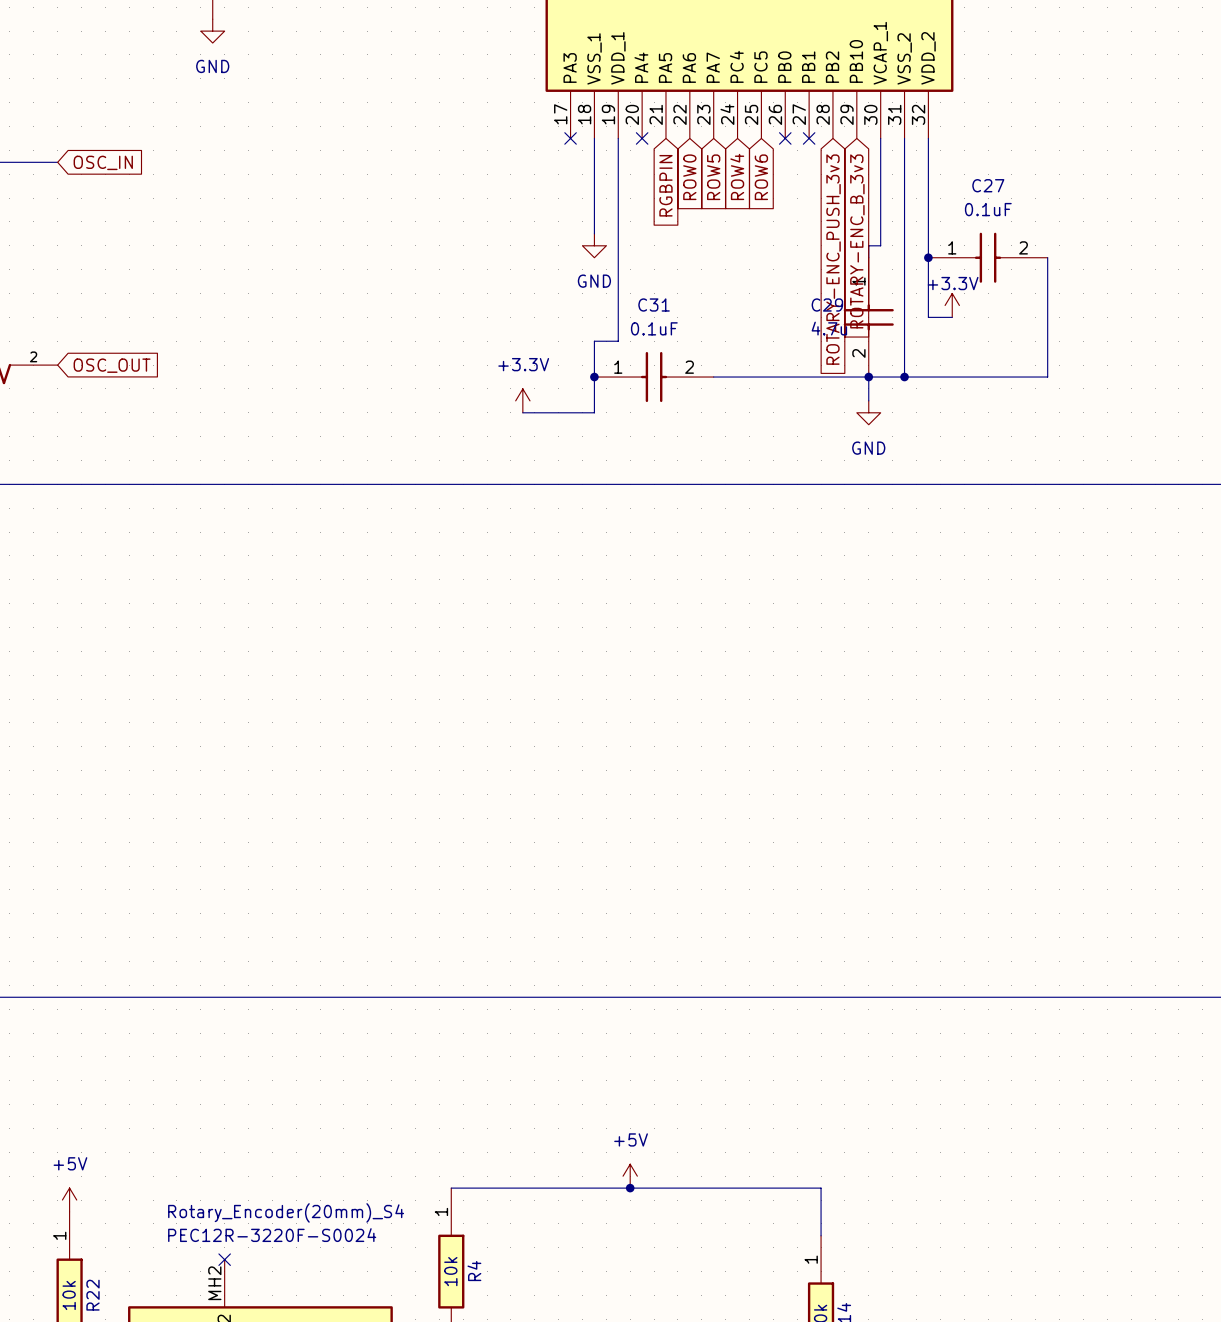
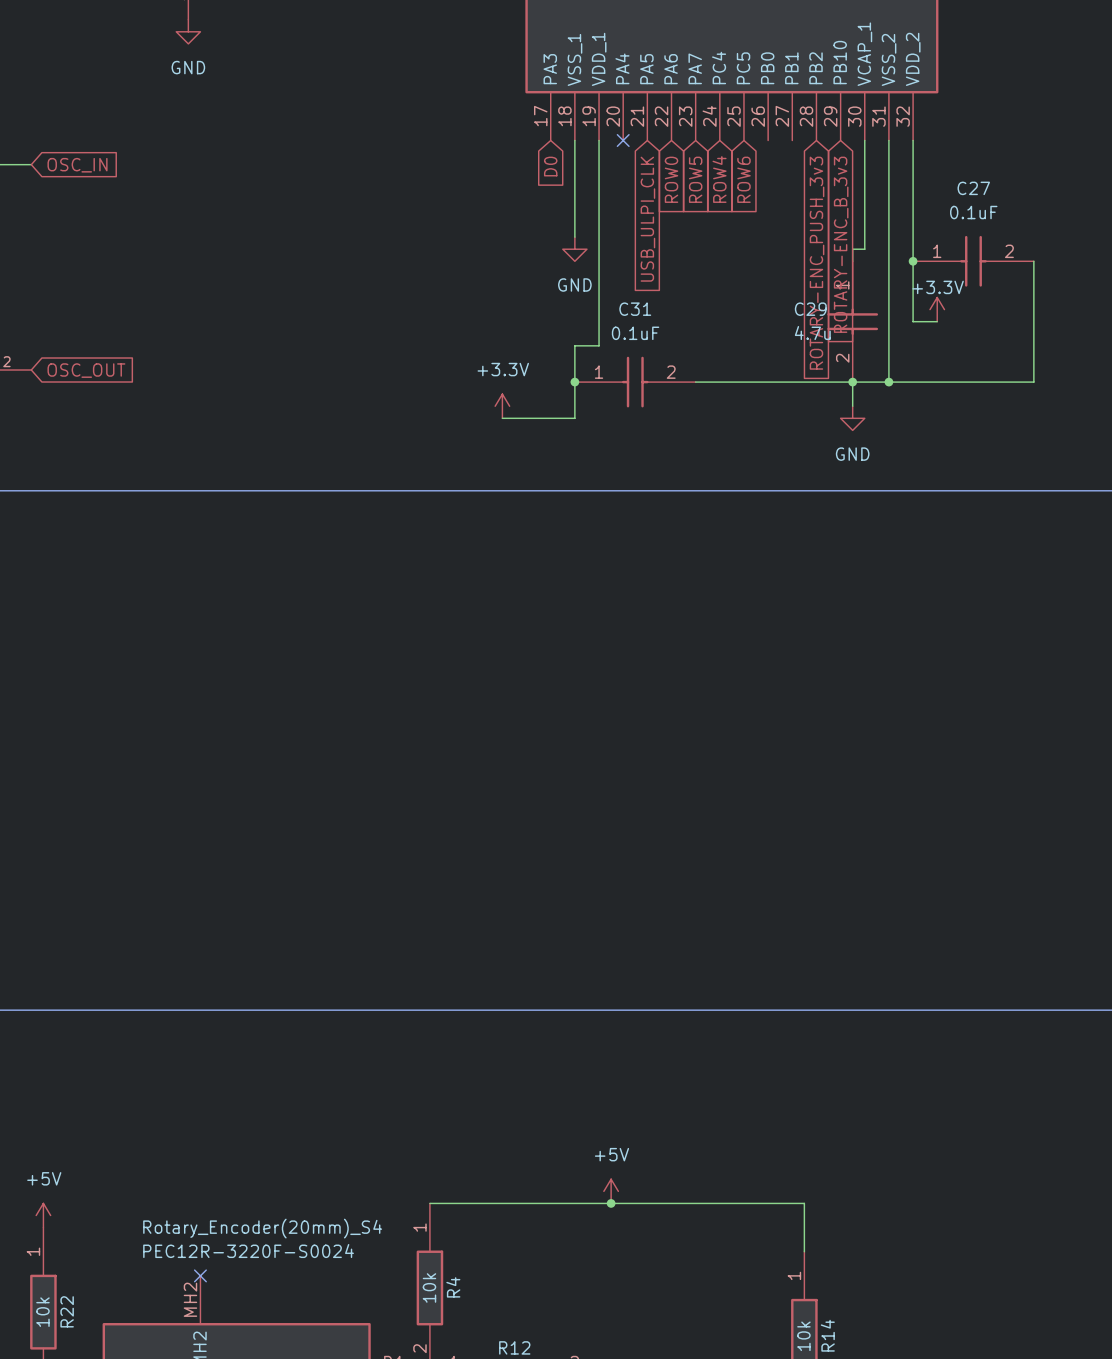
no-connect mark: (570, 138) -> none
no-connect mark: (785, 138) -> none
no-connect mark: (809, 138) -> none
global label: none -> D0 (550, 166)
global label: RGBPIN (665, 185) -> USB_ULPI_CLK (647, 219)

